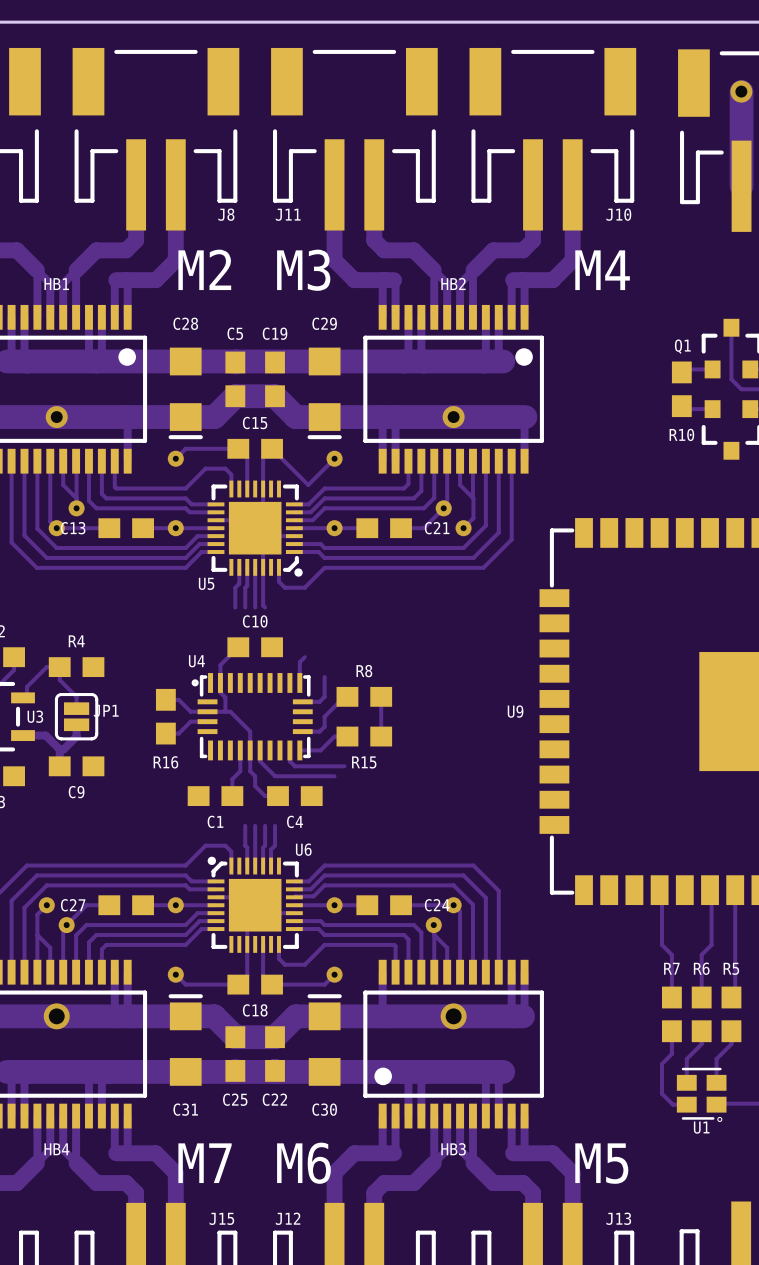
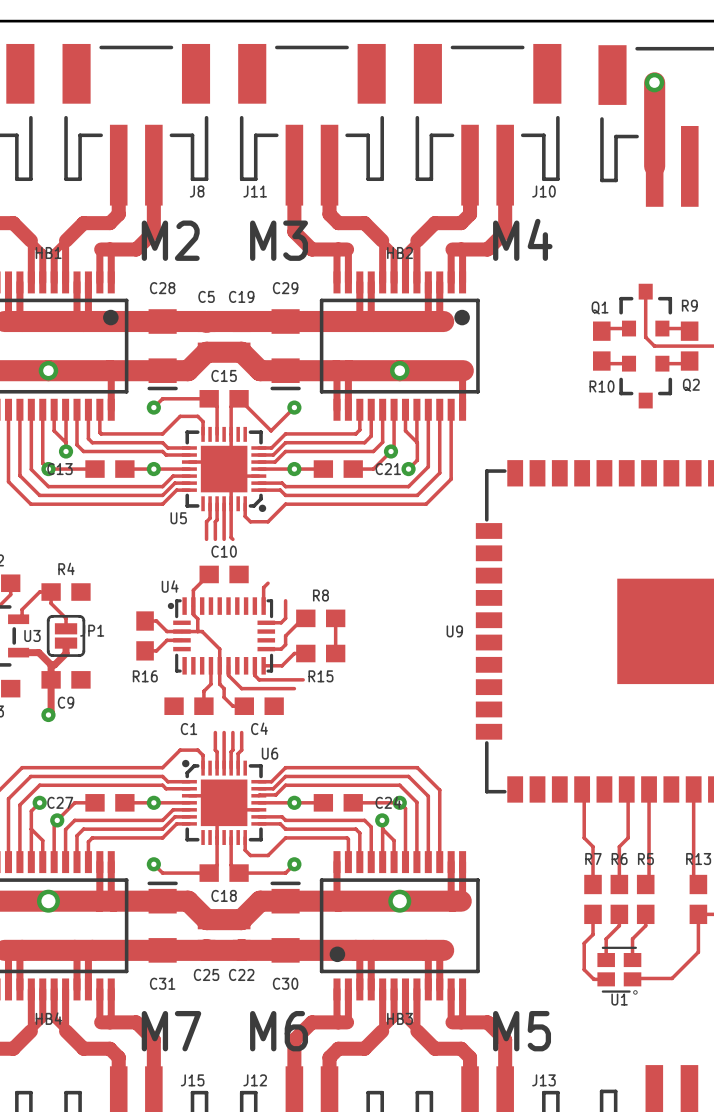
track: none -> (51, 679) (51, 712) (48, 714)
via: none -> (48, 714)

